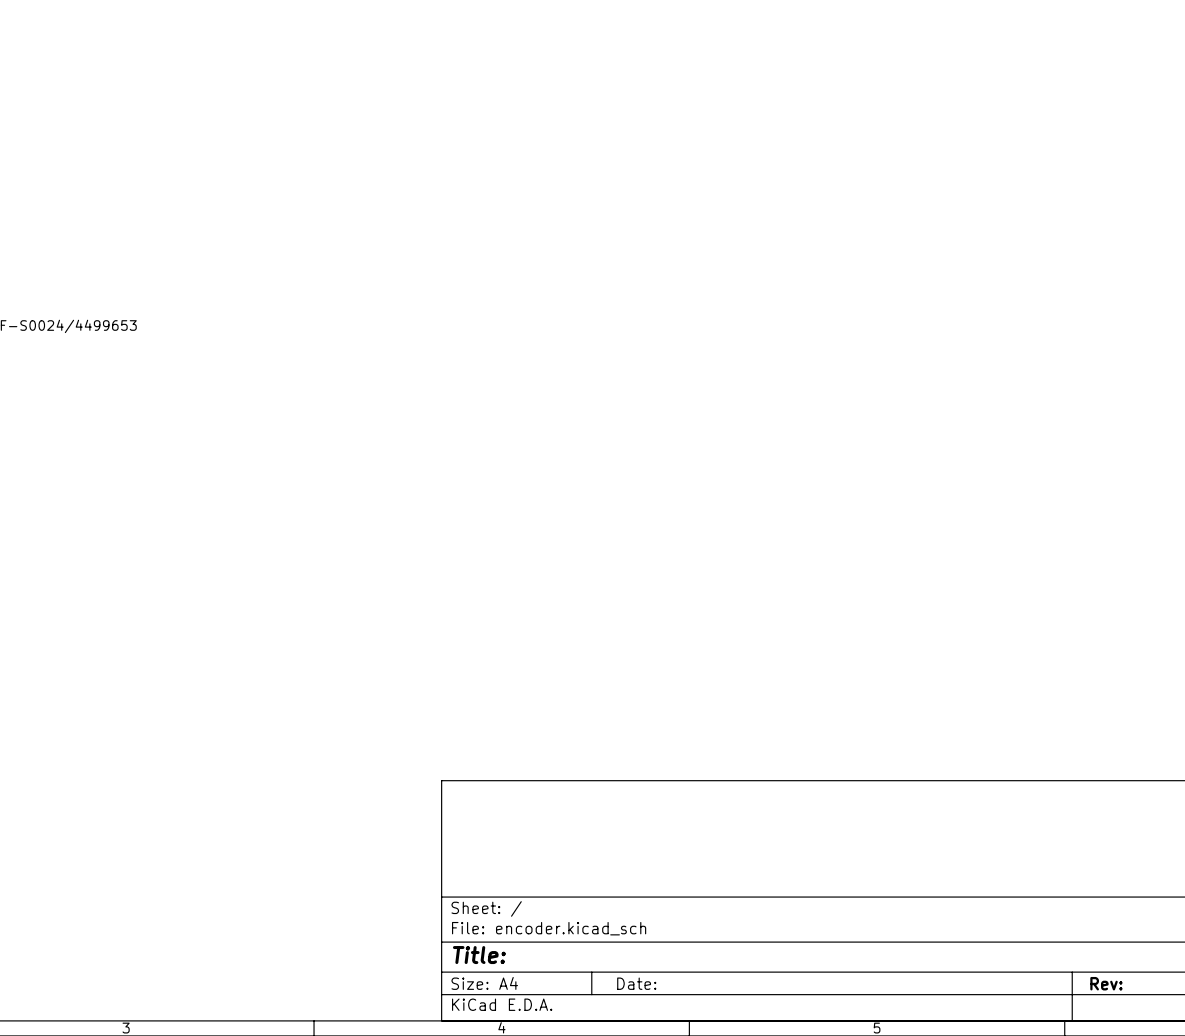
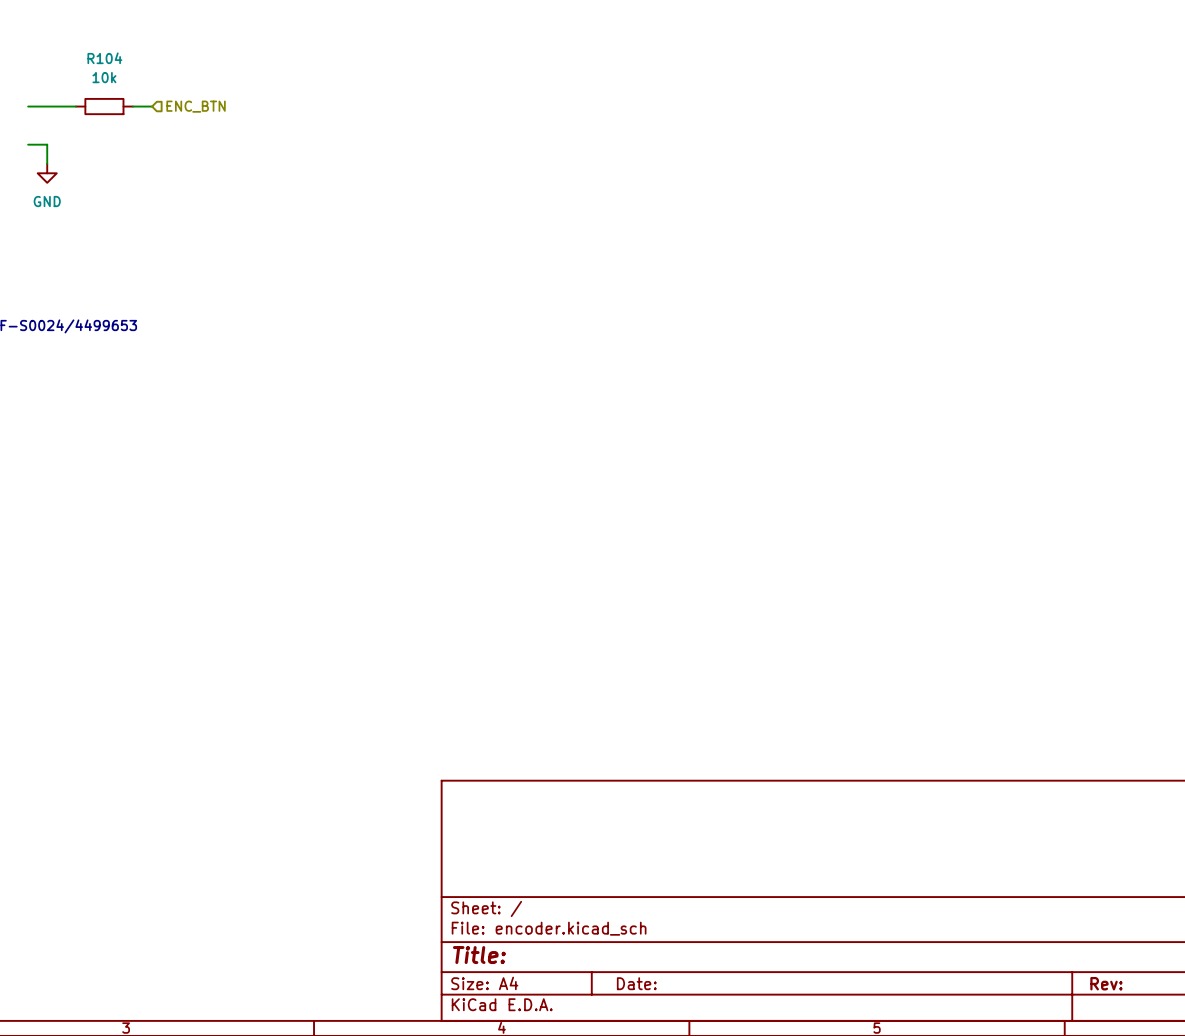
wire: none -> (28, 106) (75, 106)
R104: none -> 10k (104, 106)
wire: none -> (133, 106) (152, 106)
hierarchical label: none -> ENC_BTN (196, 106)
wire: none -> (28, 144) (47, 144) (47, 163)
power symbol: none -> GND (47, 173)

